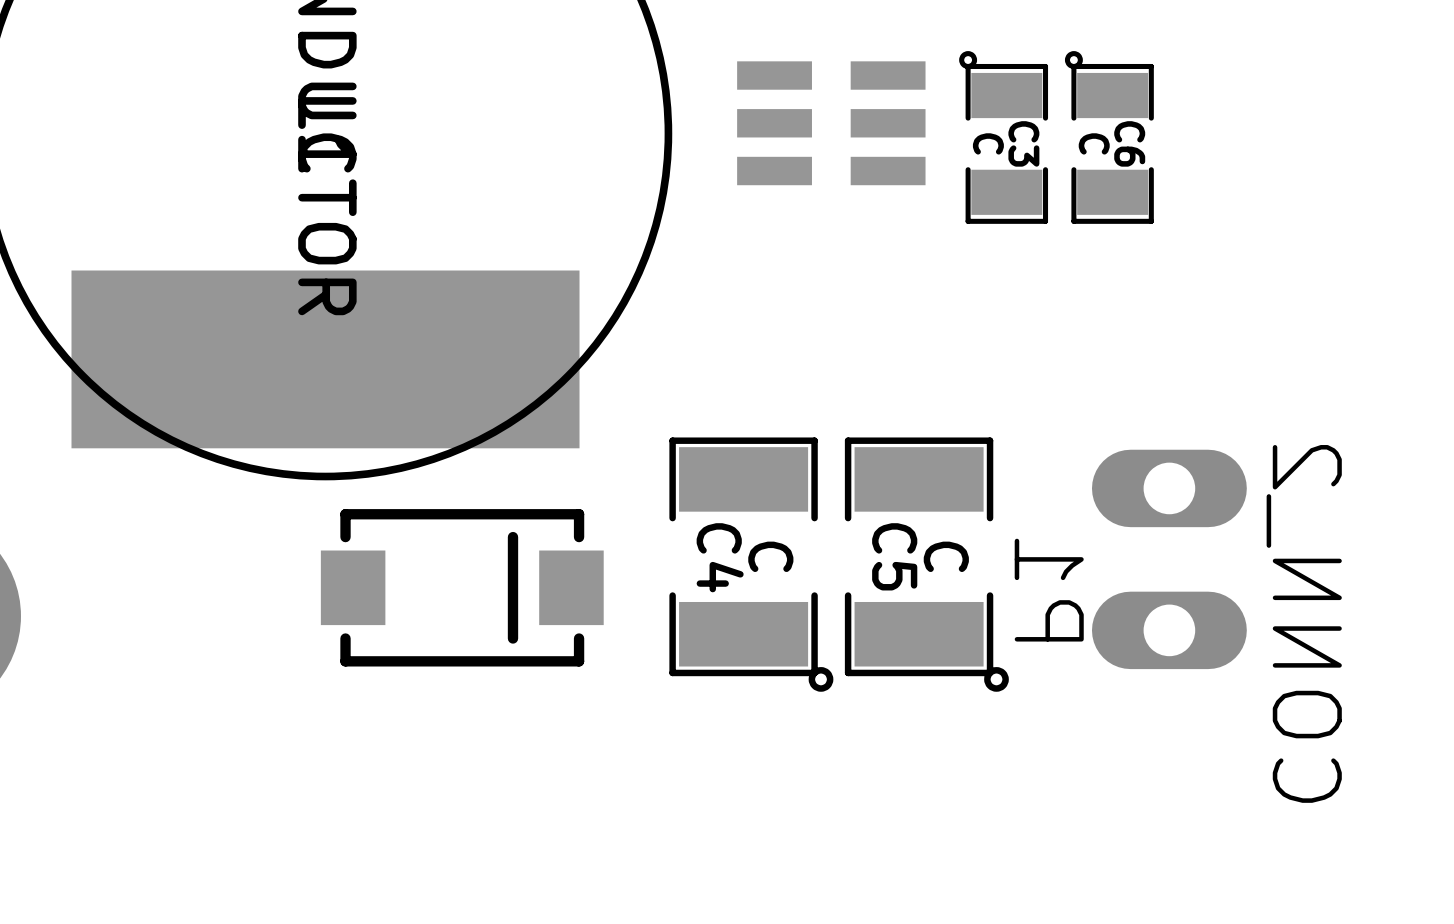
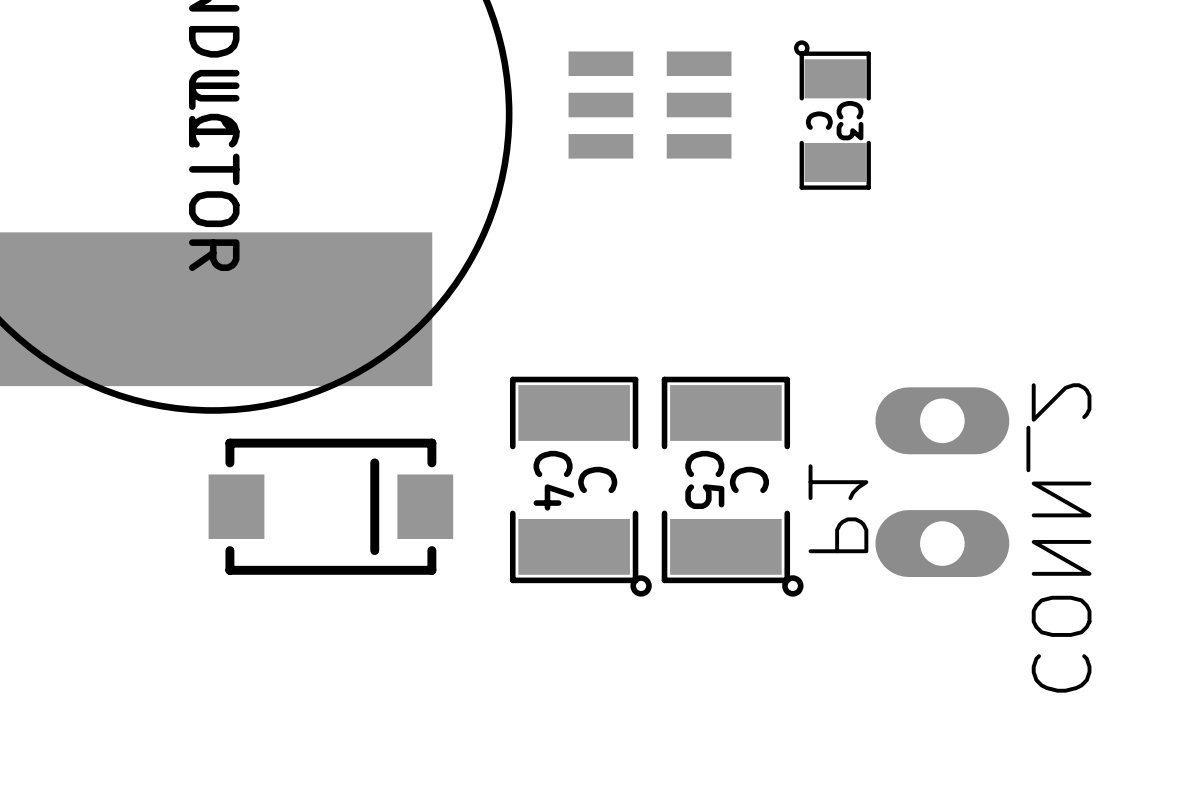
C3 position: (1003, 137) -> (832, 115)
C6: C (1109, 137) -> none

